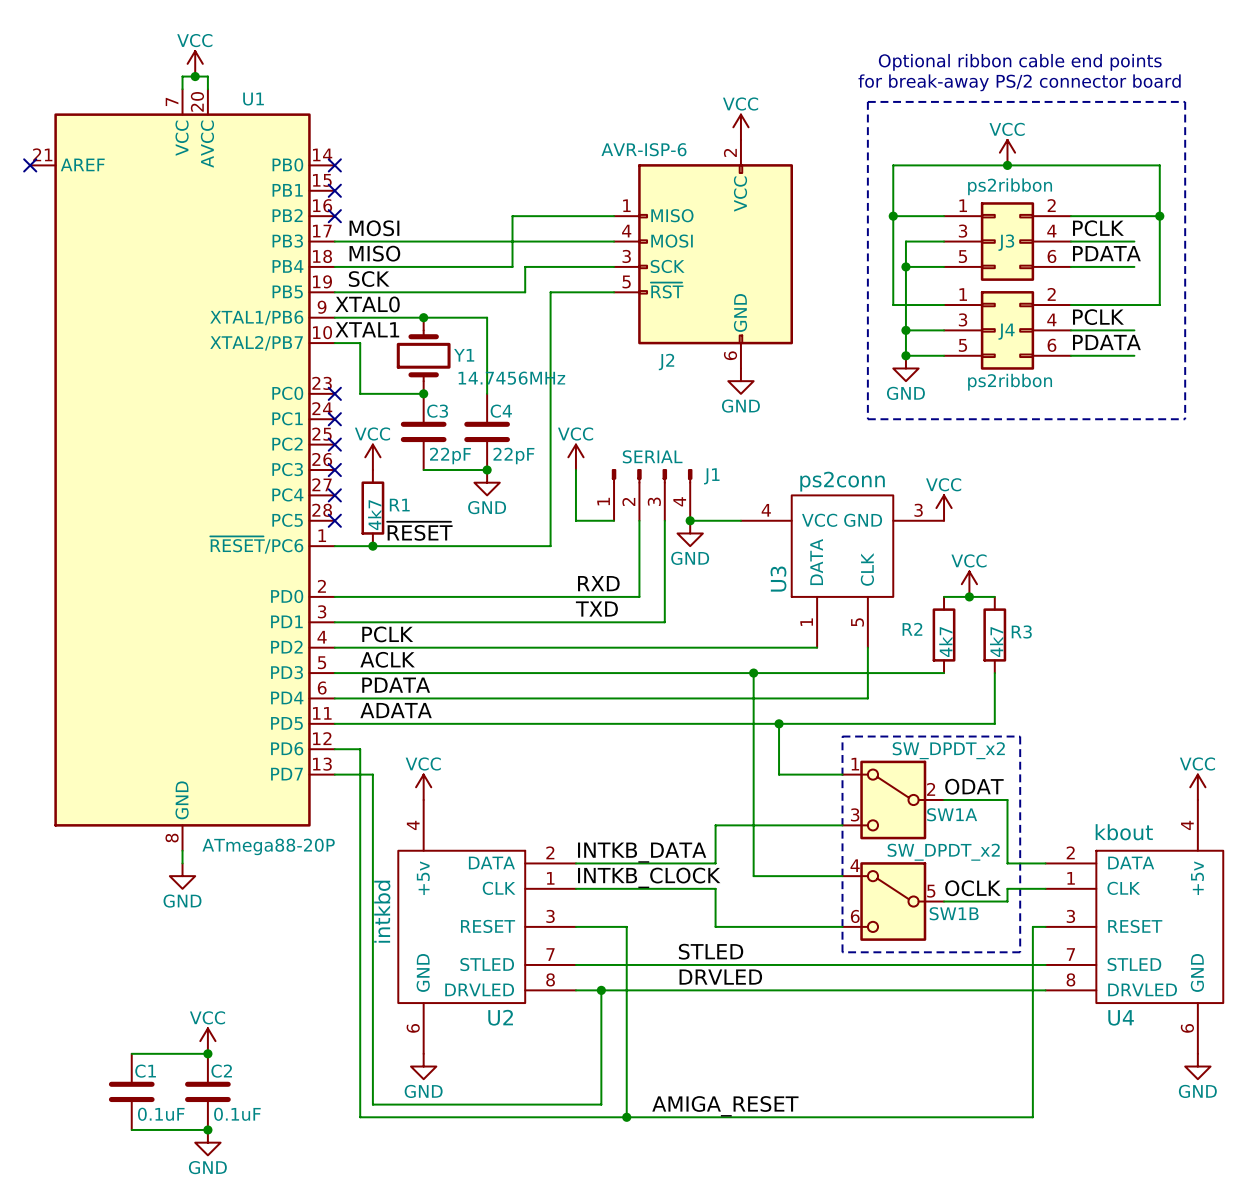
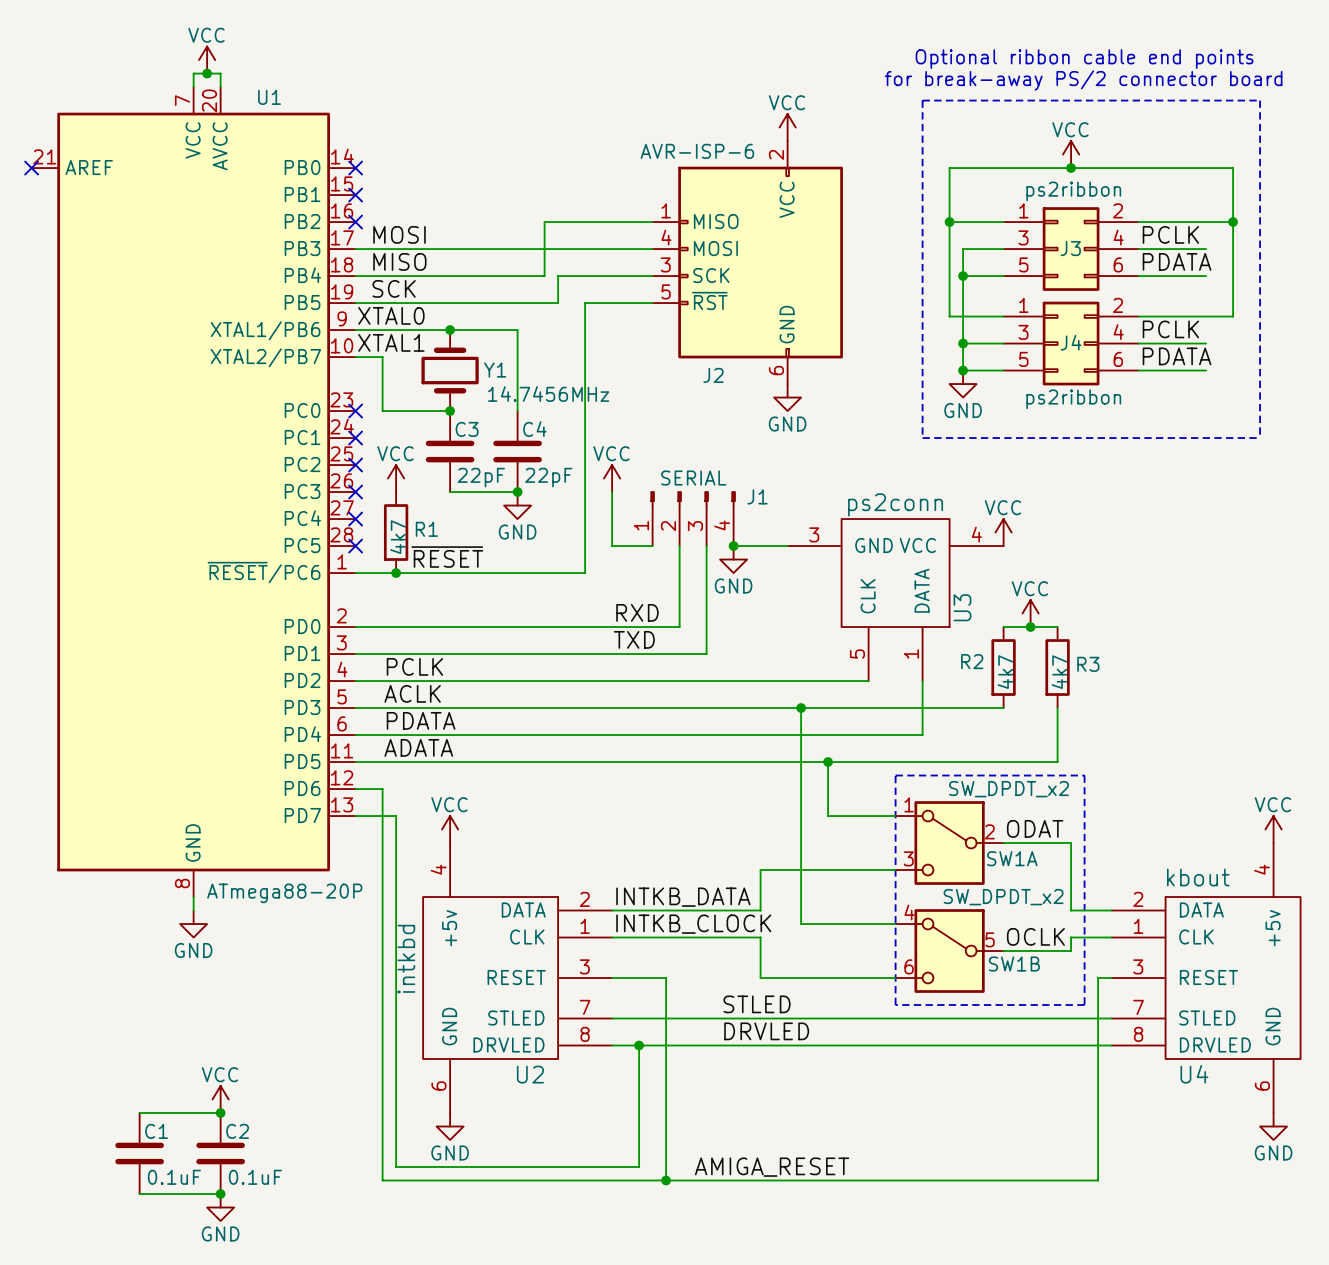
U3 flip: as is (842, 546) -> left-right (895, 573)

